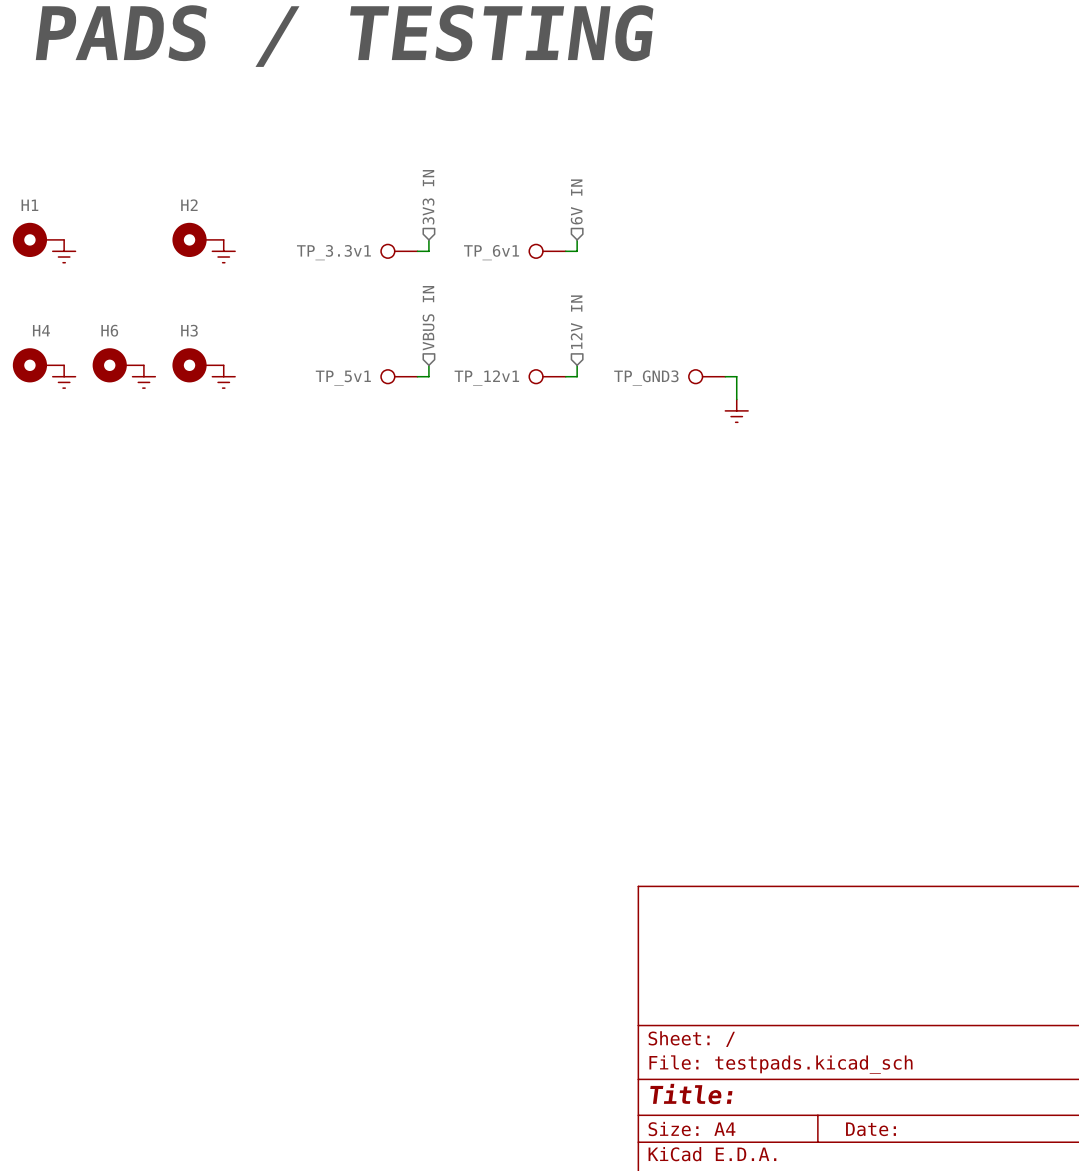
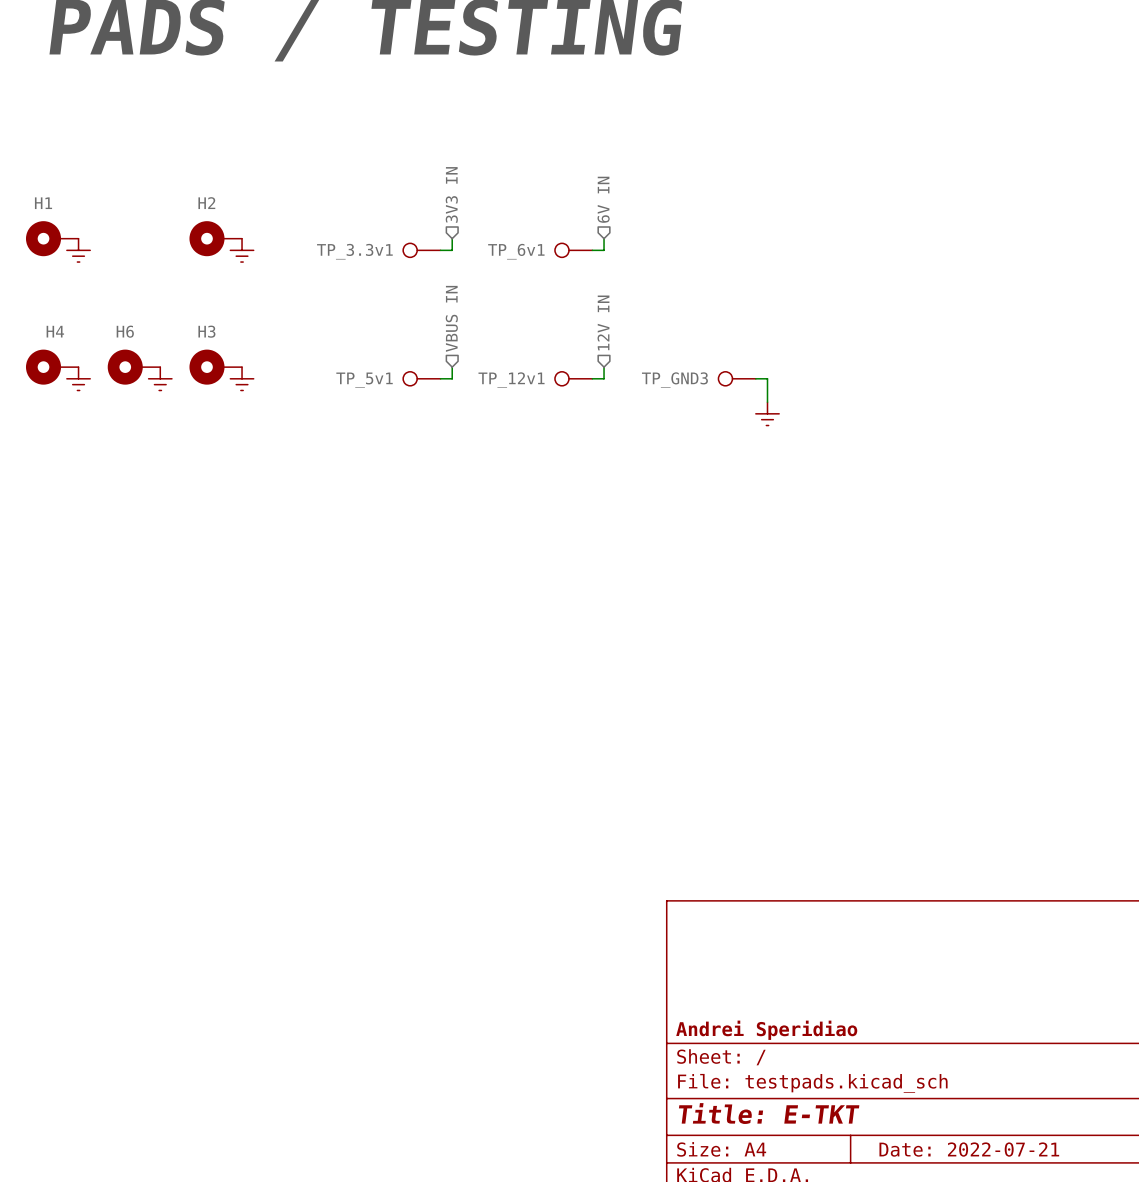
title block: none -> Andrei Speridiao (766, 1030)
title block: Title: (691, 1094) -> Title: E-TKT (769, 1113)
title block: Date: (871, 1129) -> Date: 2022-07-21 (969, 1149)

